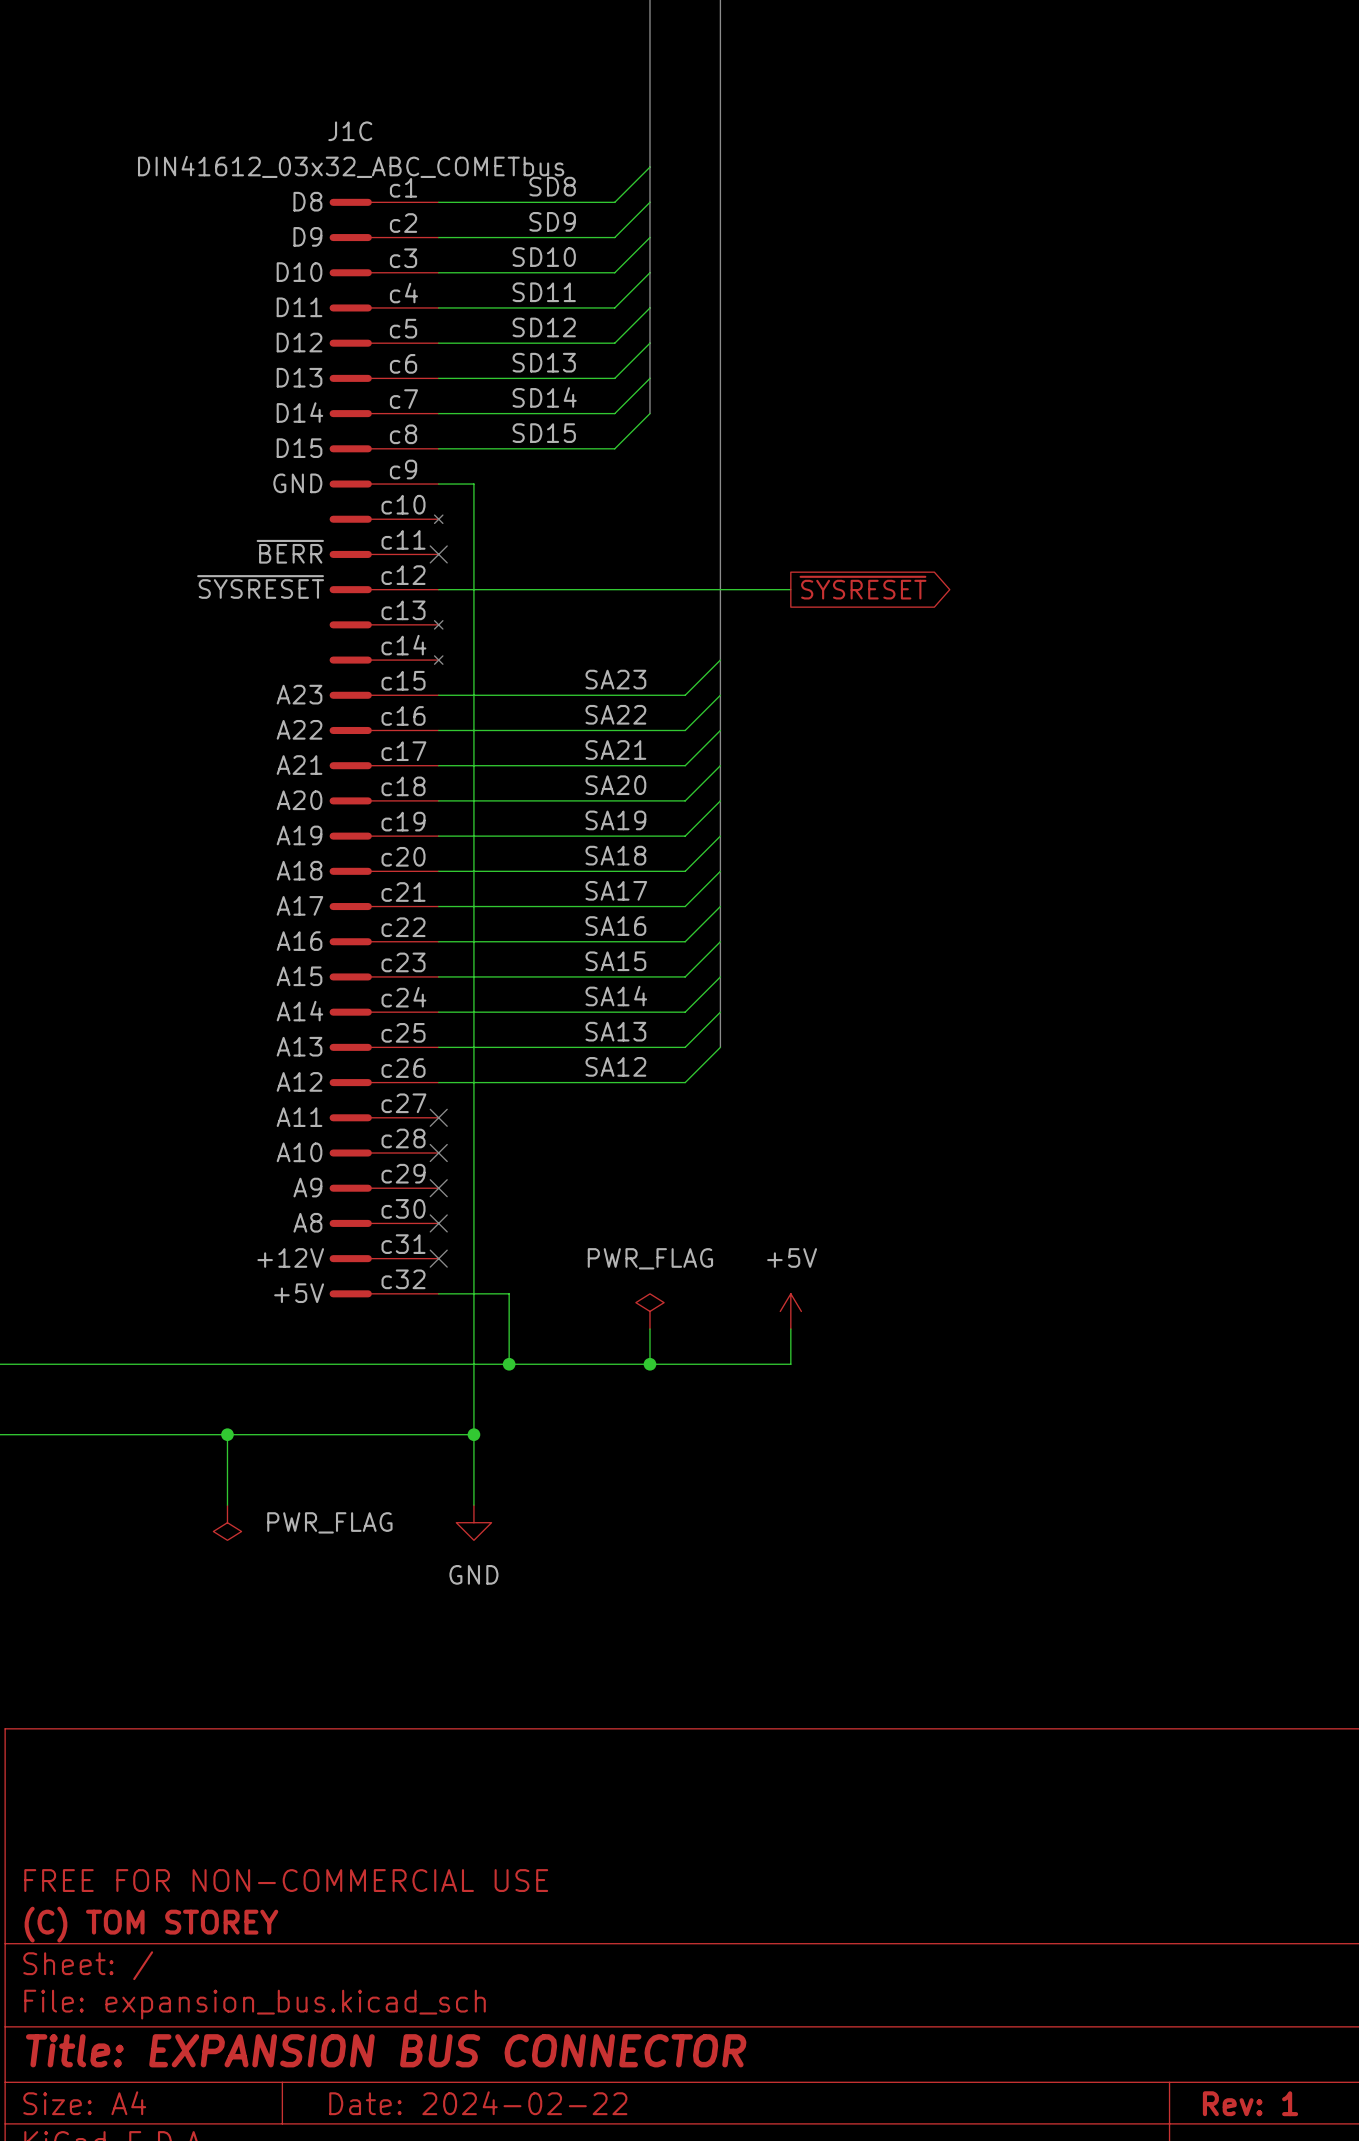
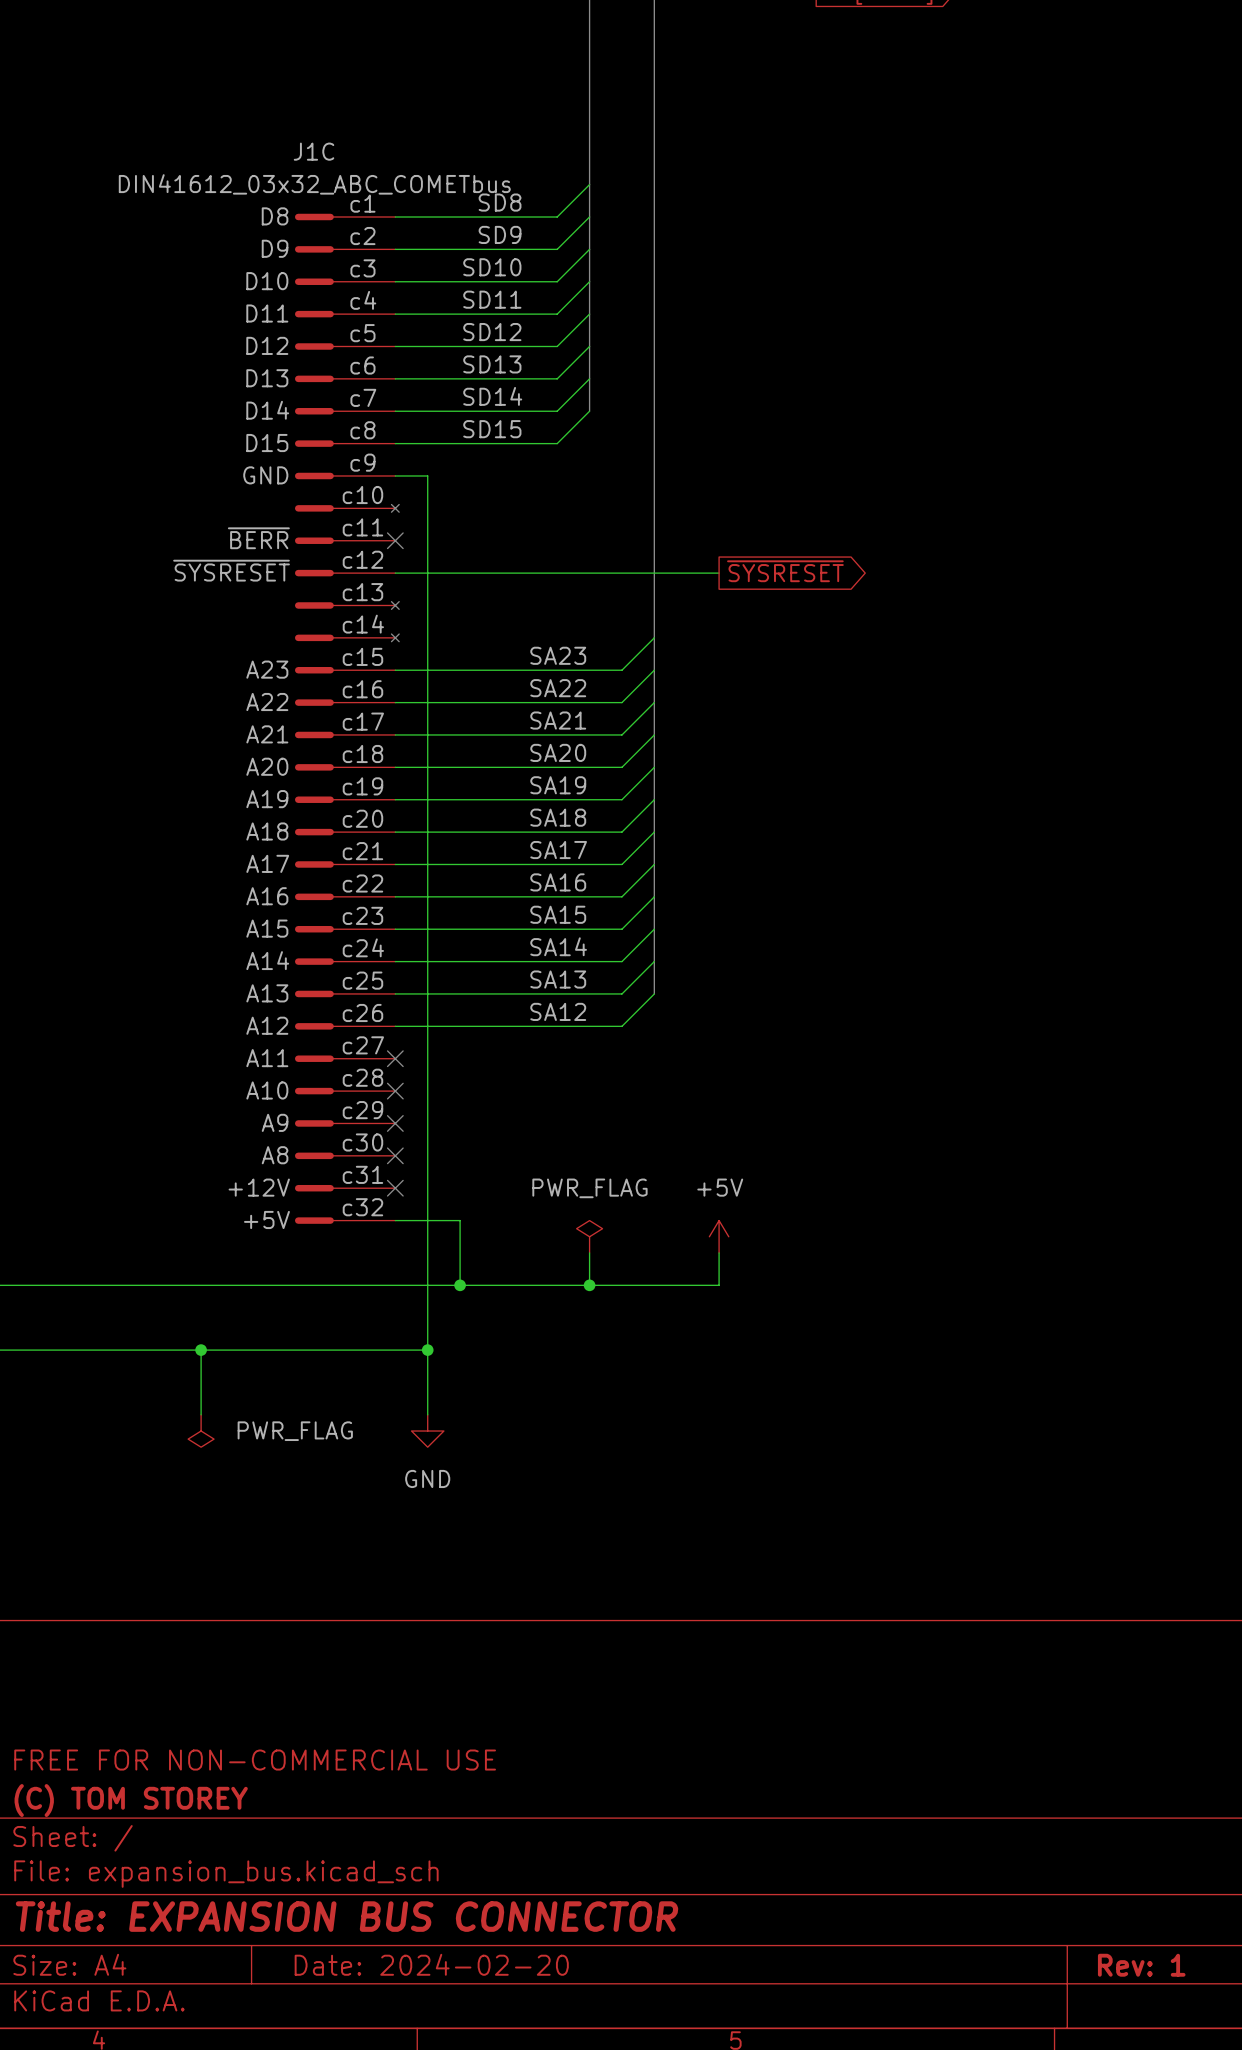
title block: Date: 2024-02-22 (478, 2103) -> Date: 2024-02-20 (431, 1964)

